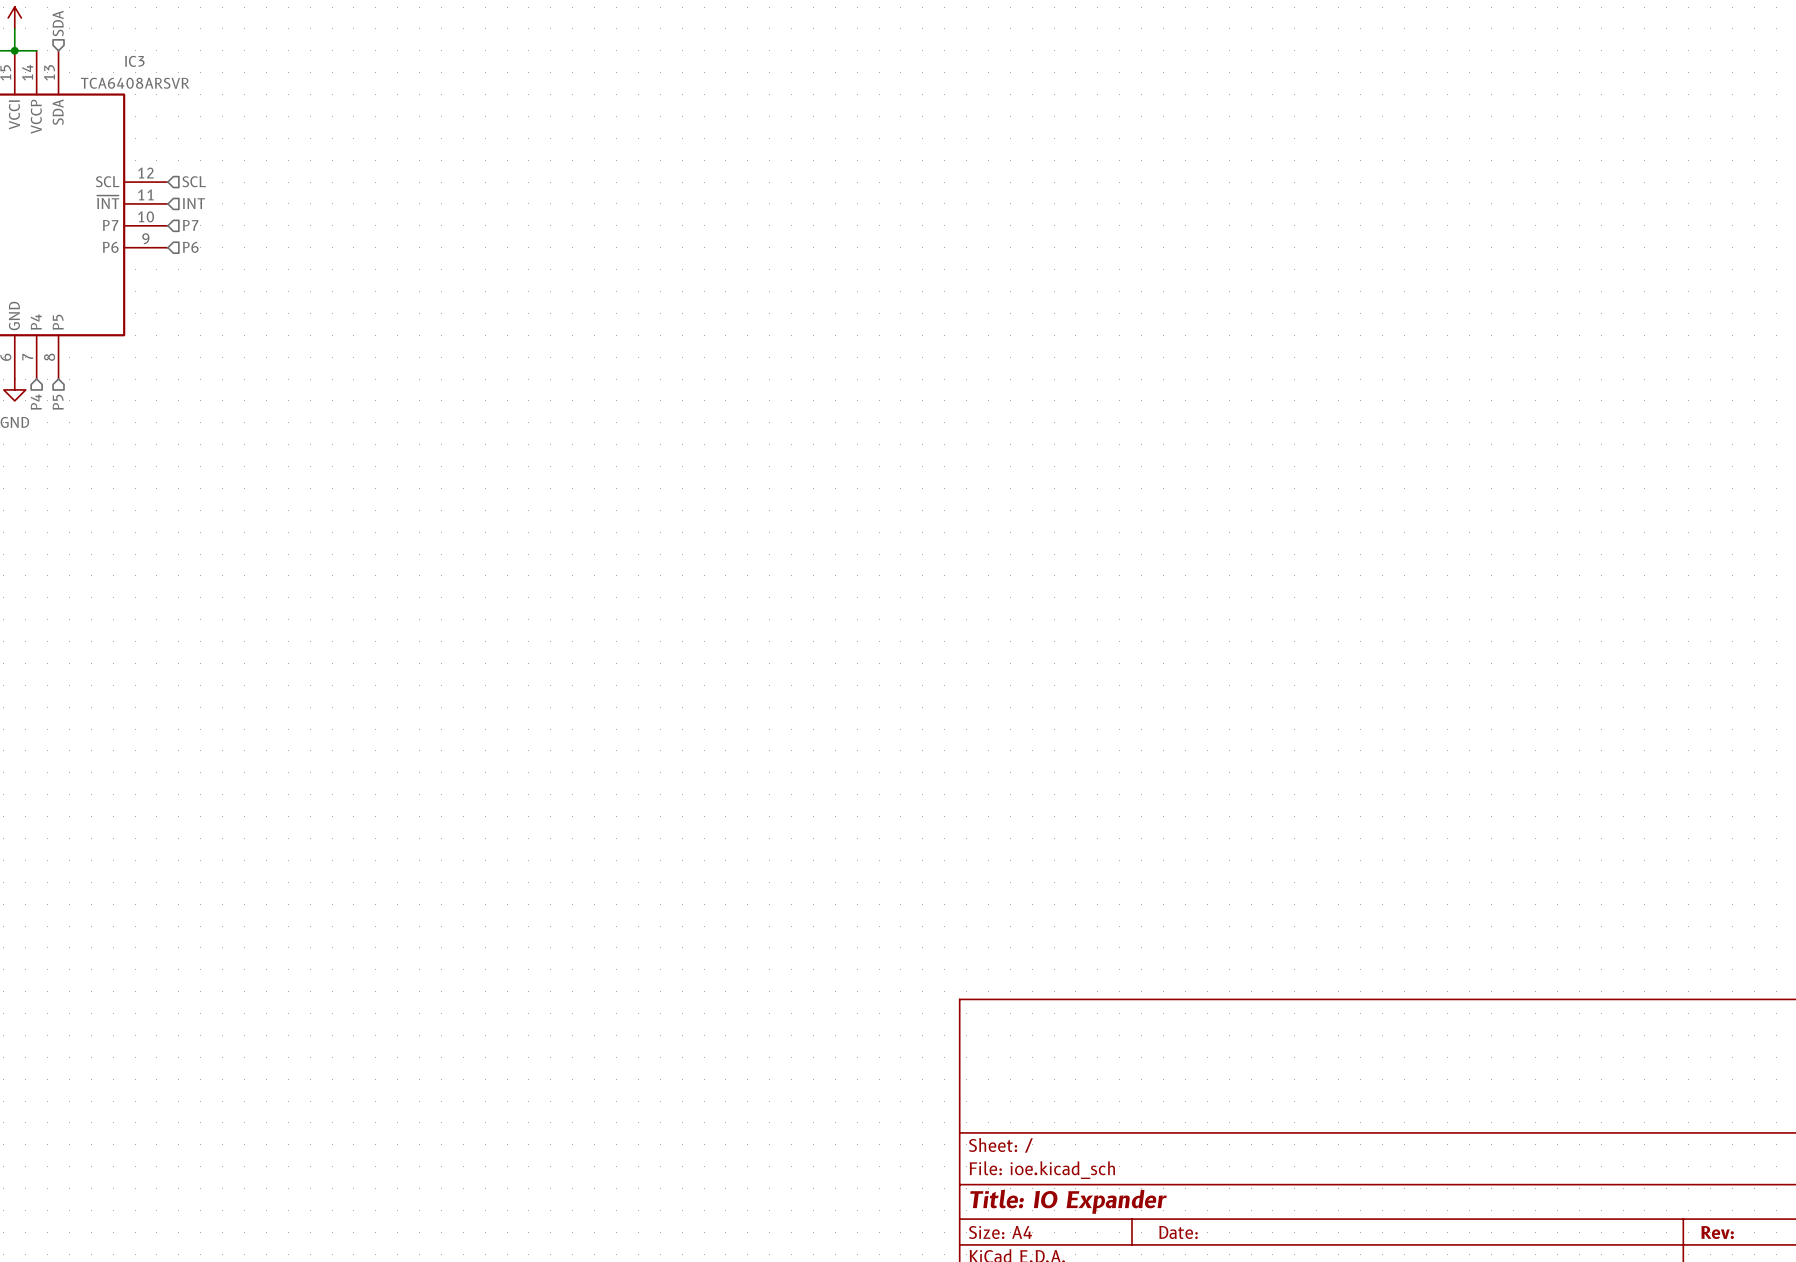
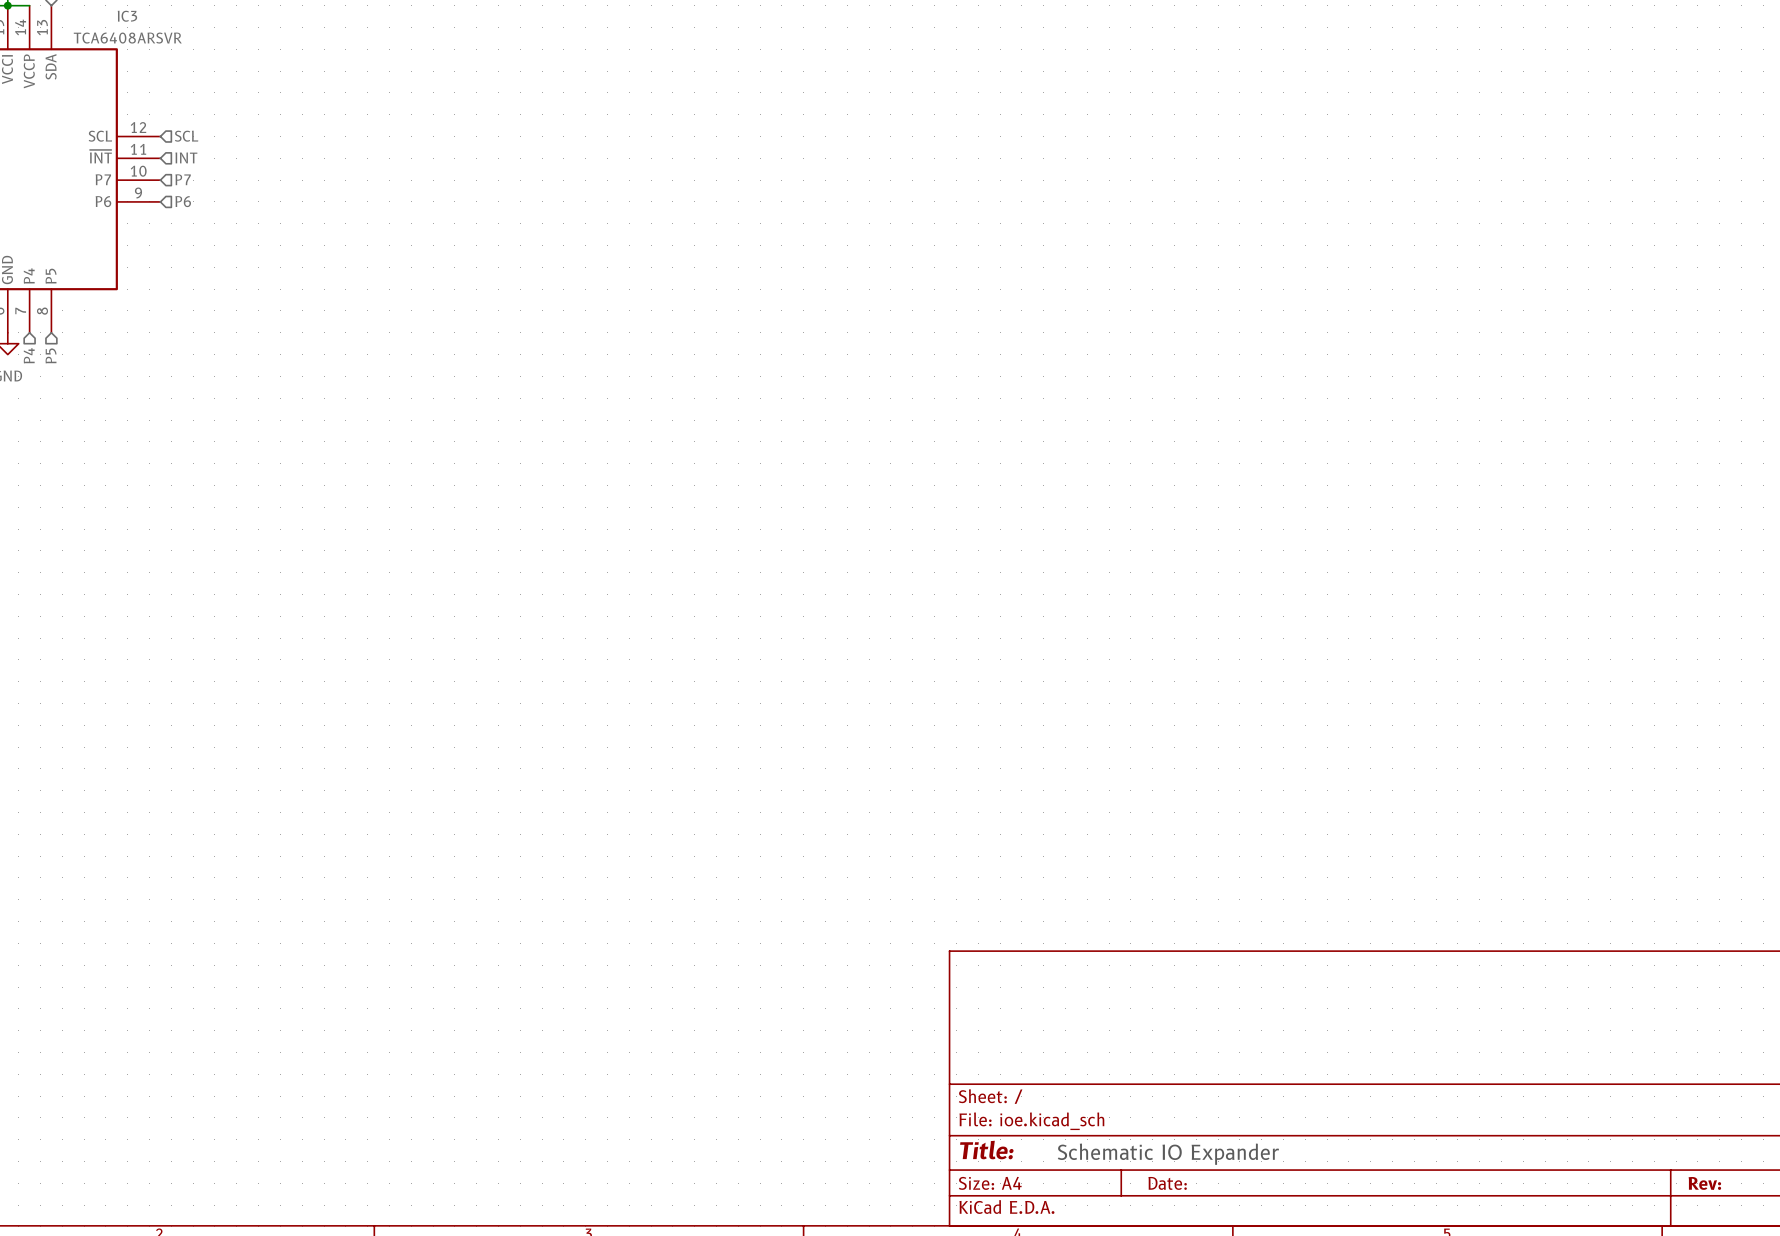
title block: Title: IO Expander (1068, 1201) -> Title: (986, 1150)
text: none -> Schematic IO Expander (1168, 1154)

